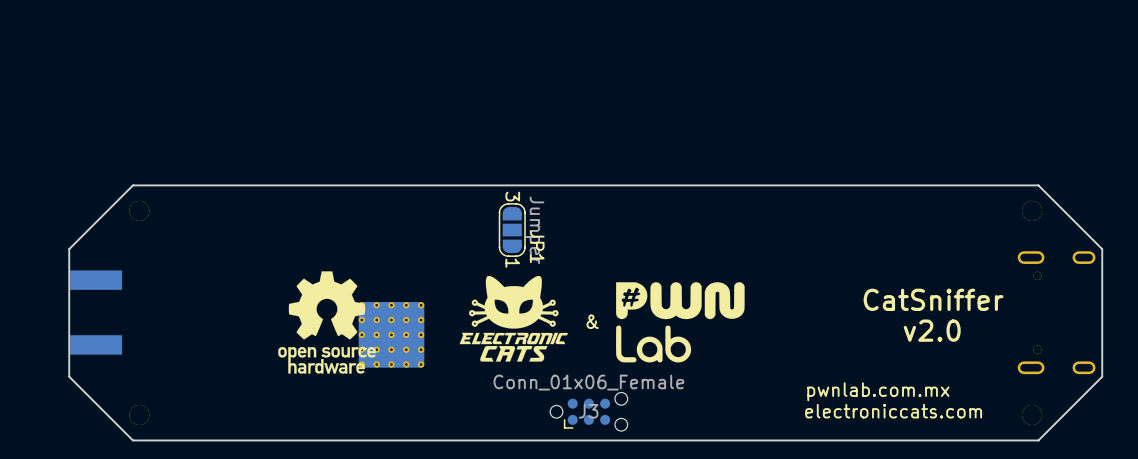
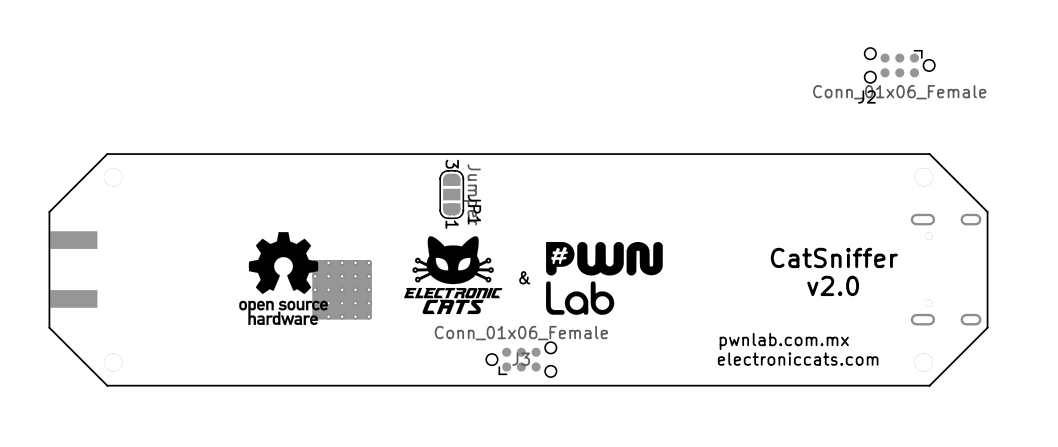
J2: none -> Conn_01x06_Female (899, 65)

